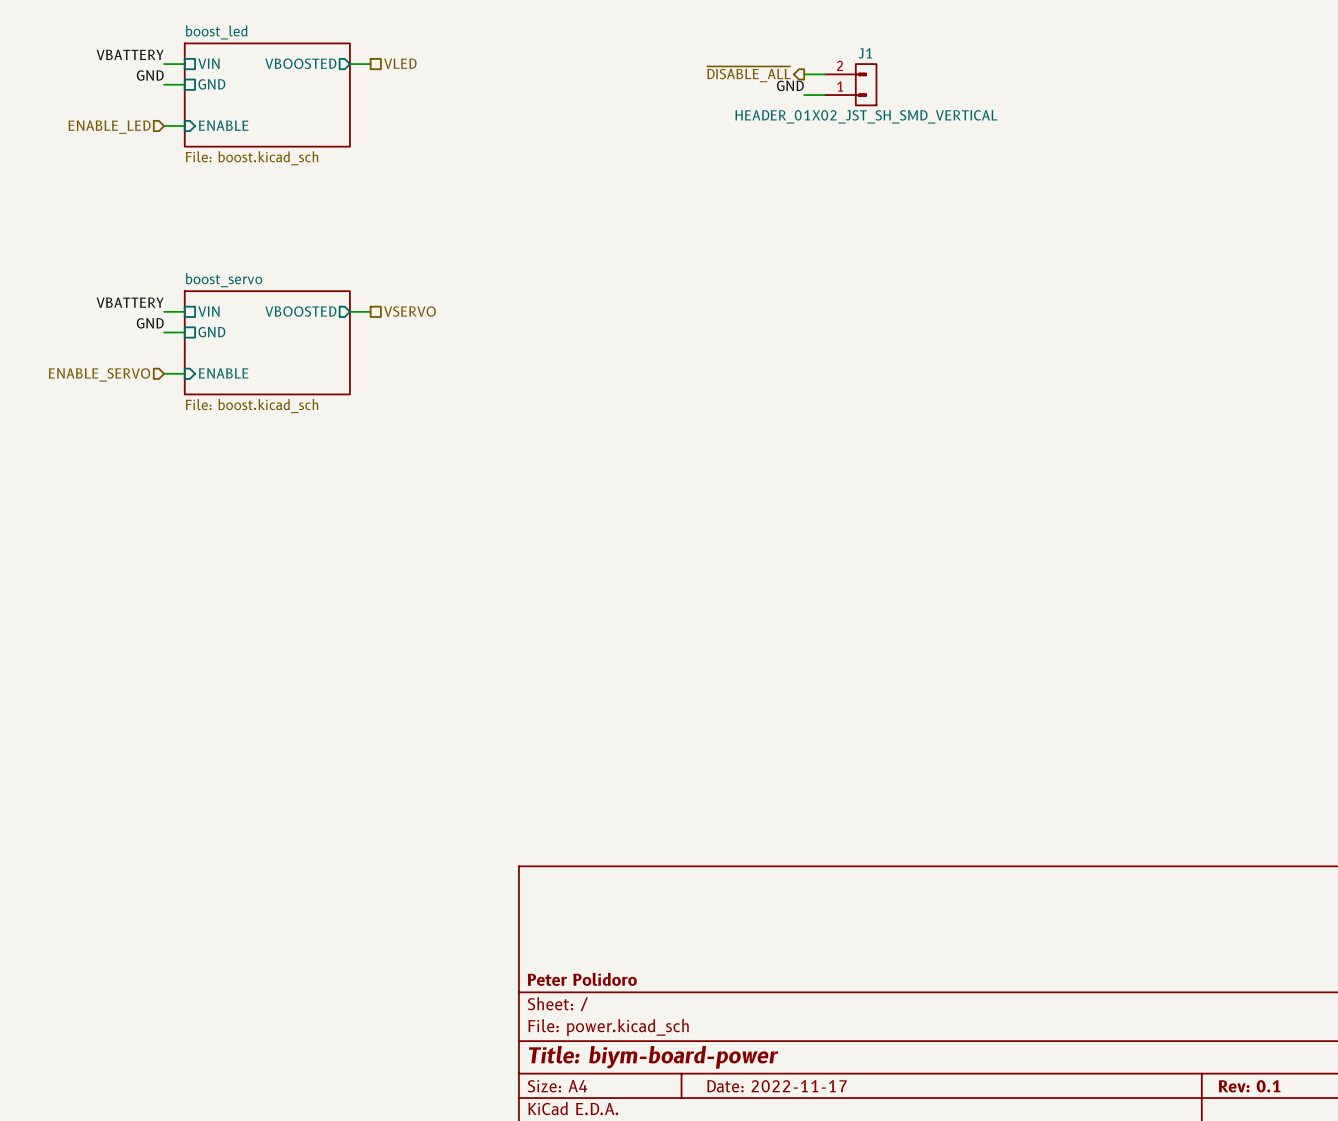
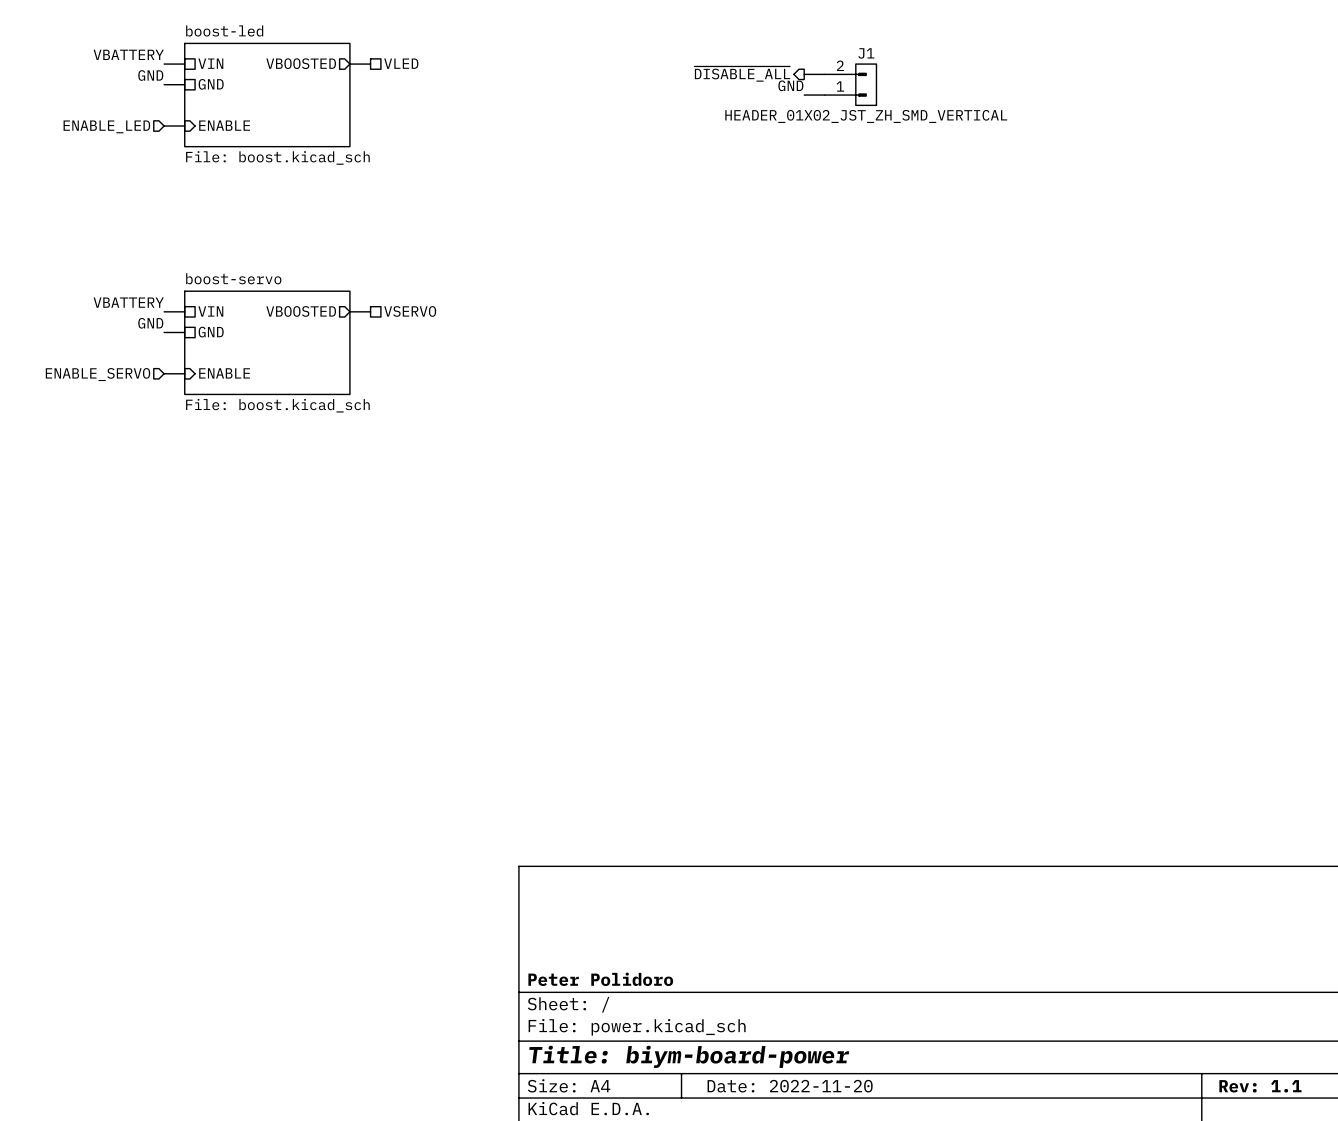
sheet boost_led name: boost_led (216, 32) -> boost-led (224, 30)
J1 value: HEADER_01X02_JST_SH_SMD_VERTICAL (866, 116) -> HEADER_01X02_JST_ZH_SMD_VERTICAL (866, 116)
sheet boost_servo name: boost_servo (224, 280) -> boost-servo (233, 278)
title block: Date: 2022-11-17 (776, 1086) -> Date: 2022-11-20 (790, 1086)
title block: Rev: 0.1 (1249, 1086) -> Rev: 1.1 (1260, 1086)

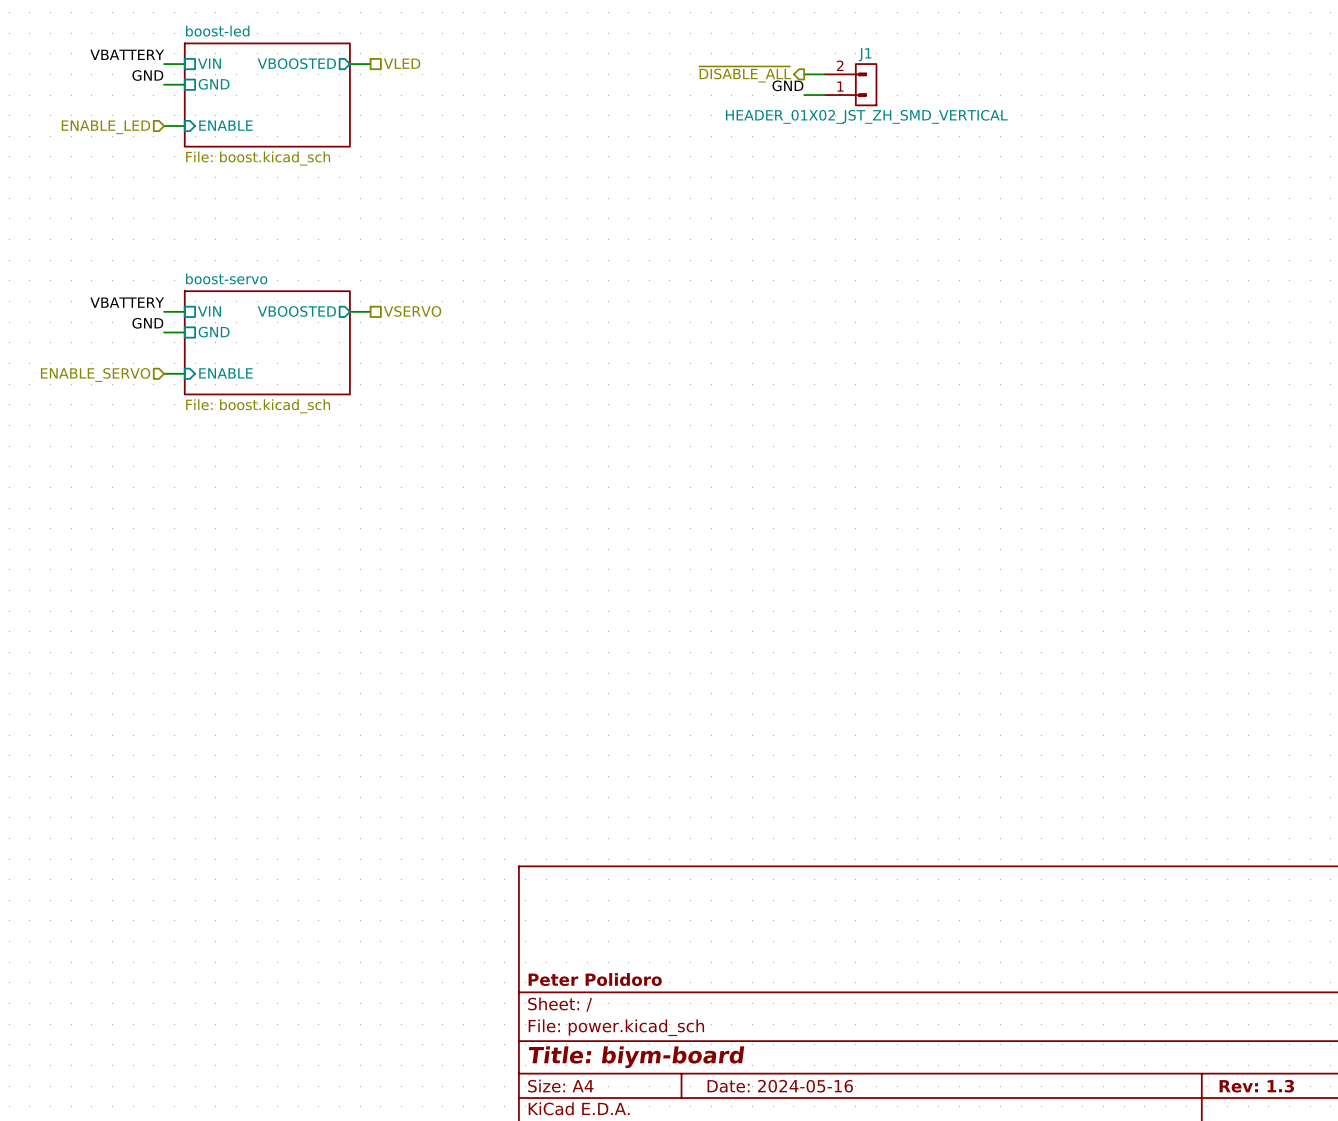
title block: Title: biym-board-power (689, 1056) -> Title: biym-board (636, 1057)
title block: Date: 2022-11-20 (790, 1086) -> Date: 2024-05-16 (780, 1086)
title block: Rev: 1.1 (1260, 1086) -> Rev: 1.3 (1256, 1086)

